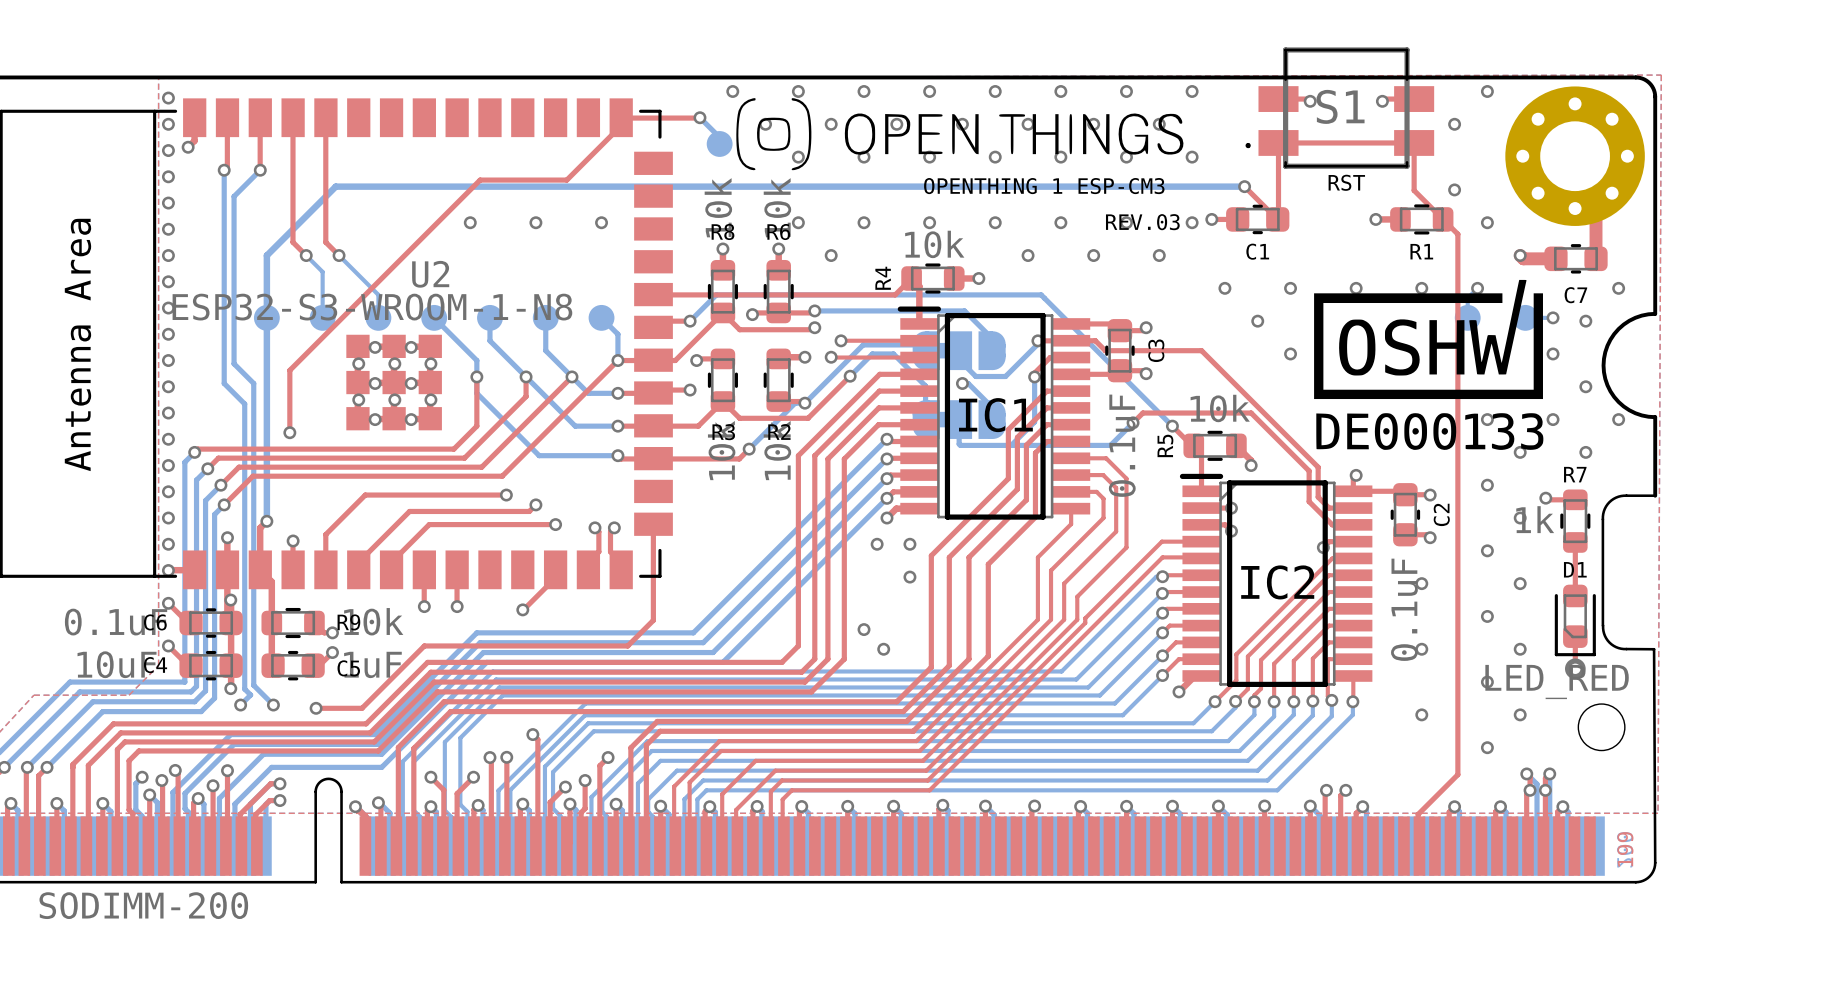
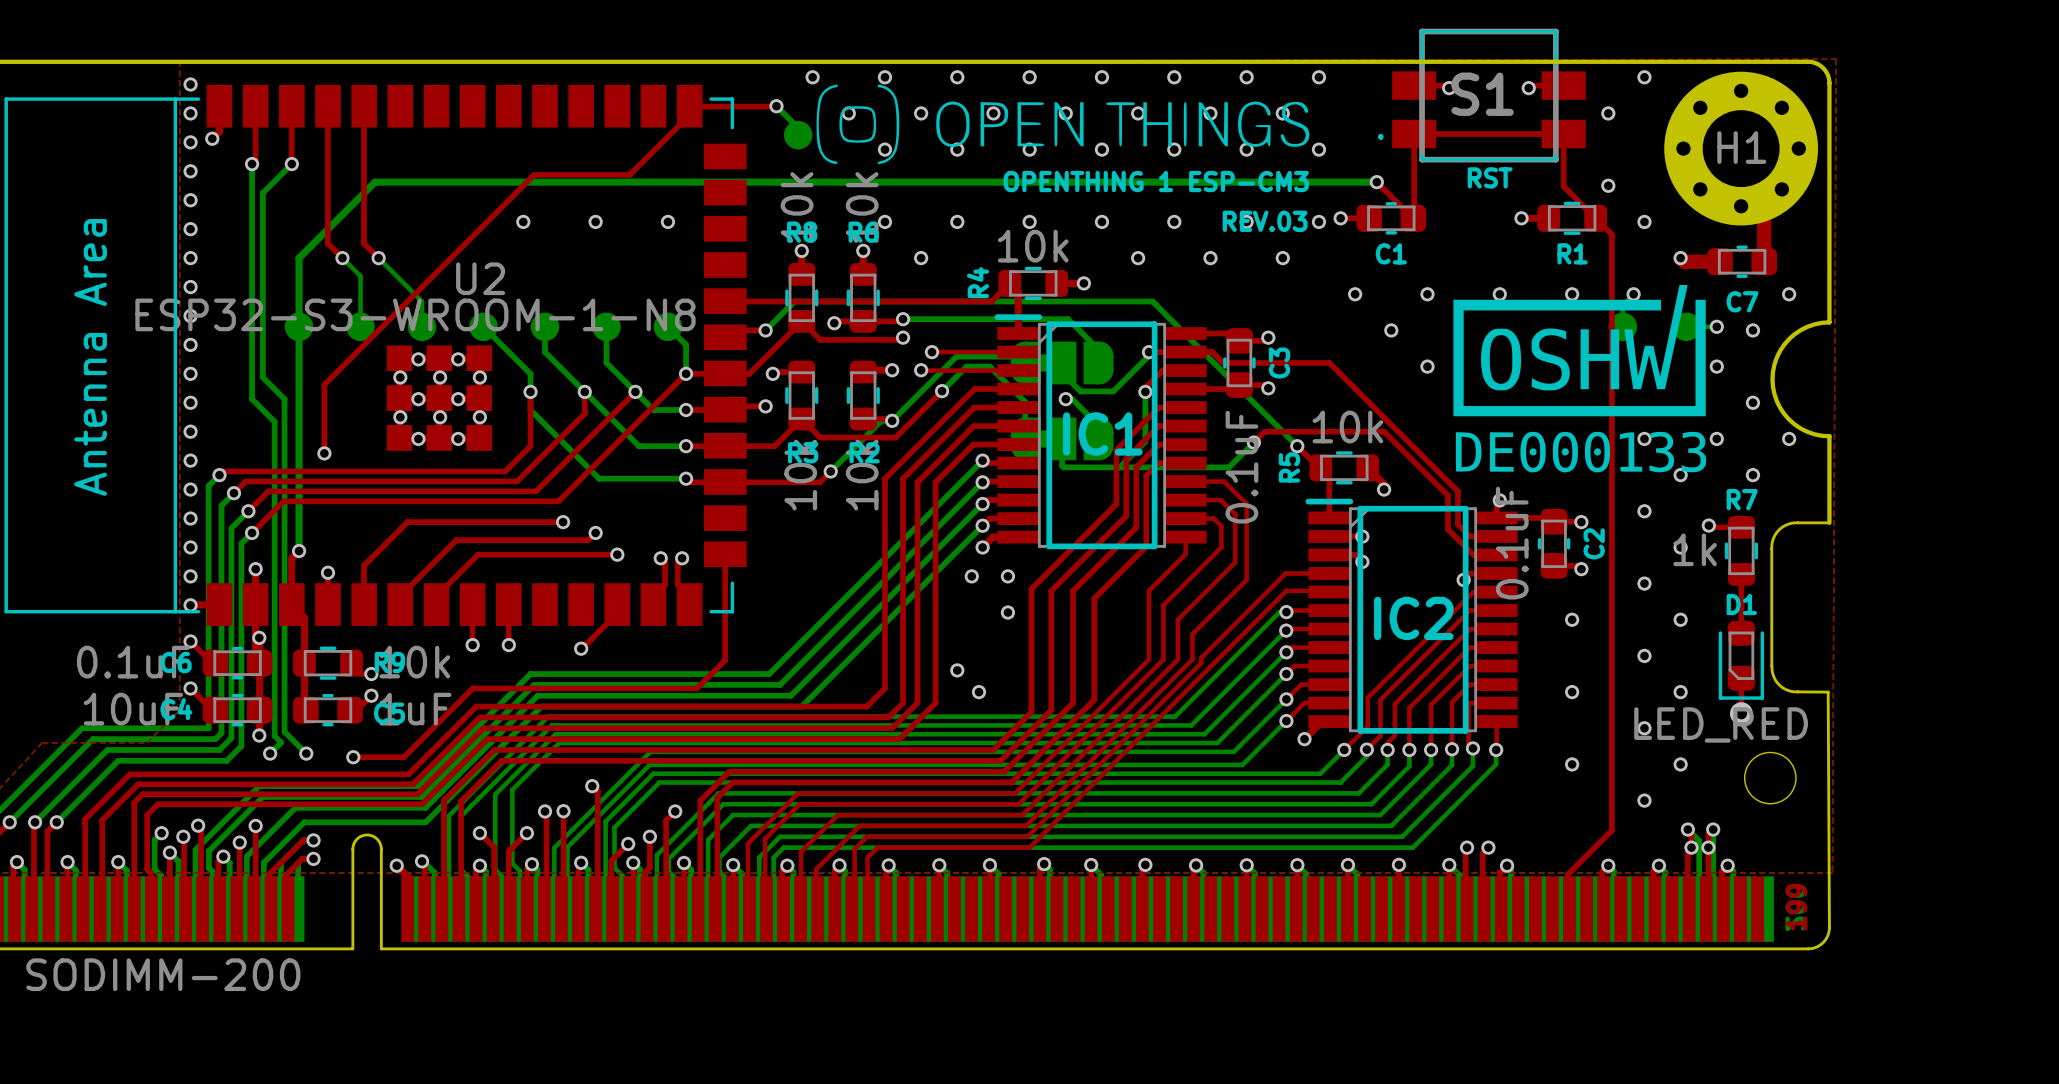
H1 name: none -> H1 (1741, 147)
C2 value position: 0.1uF (1404, 609) -> 0.1uF (1512, 543)

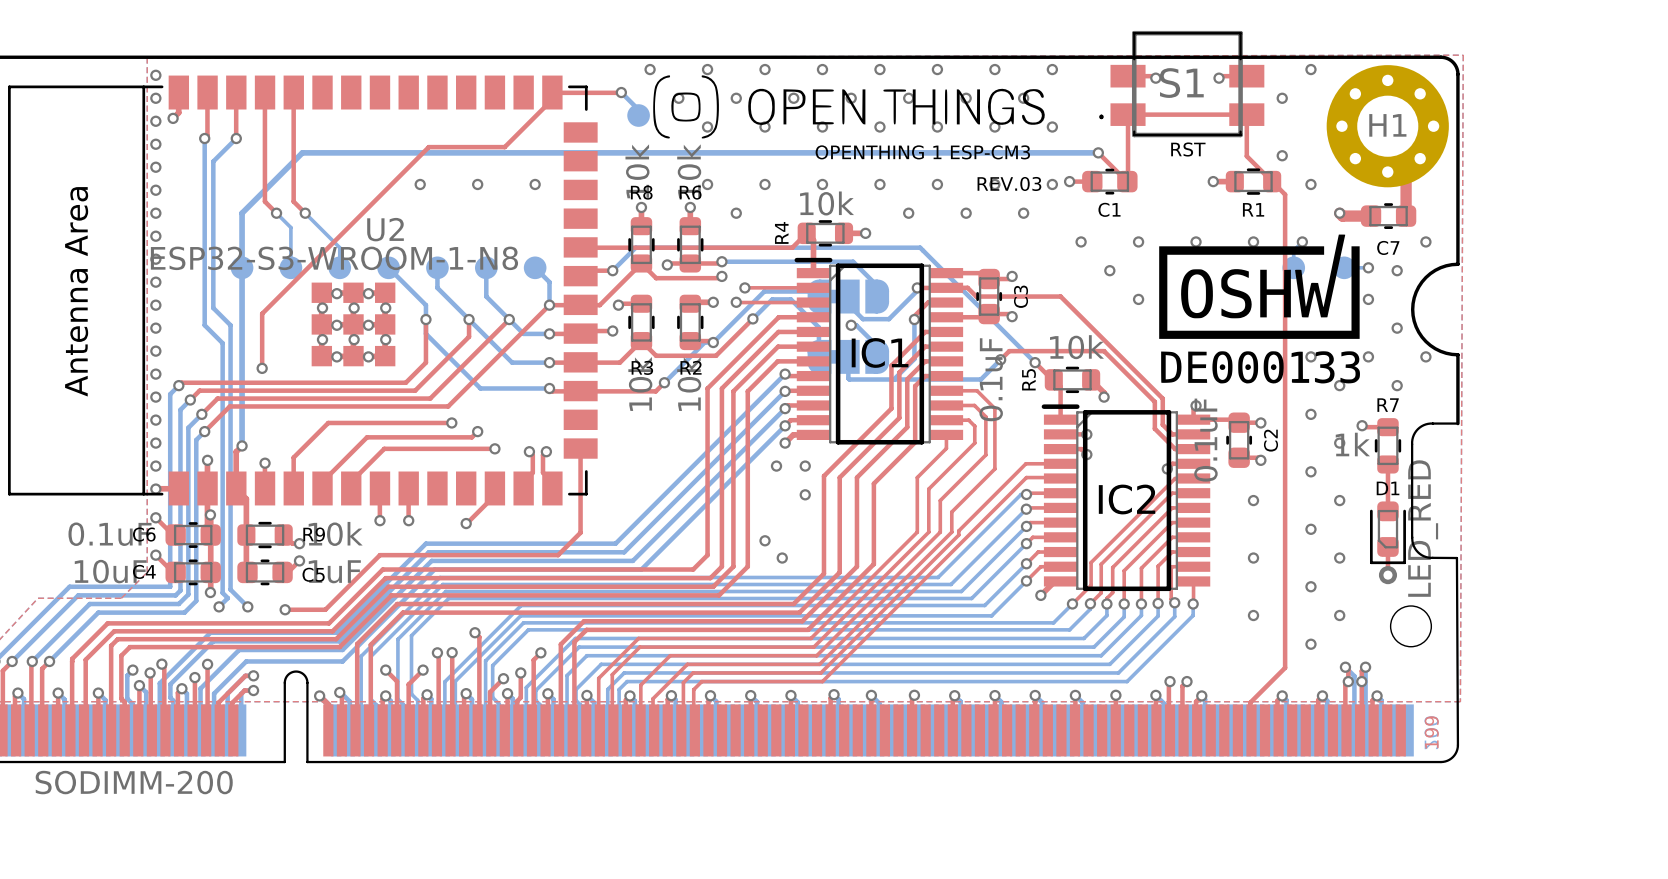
D1 value rotation: 0° (1721, 724) -> 90° counterclockwise (1423, 528)

